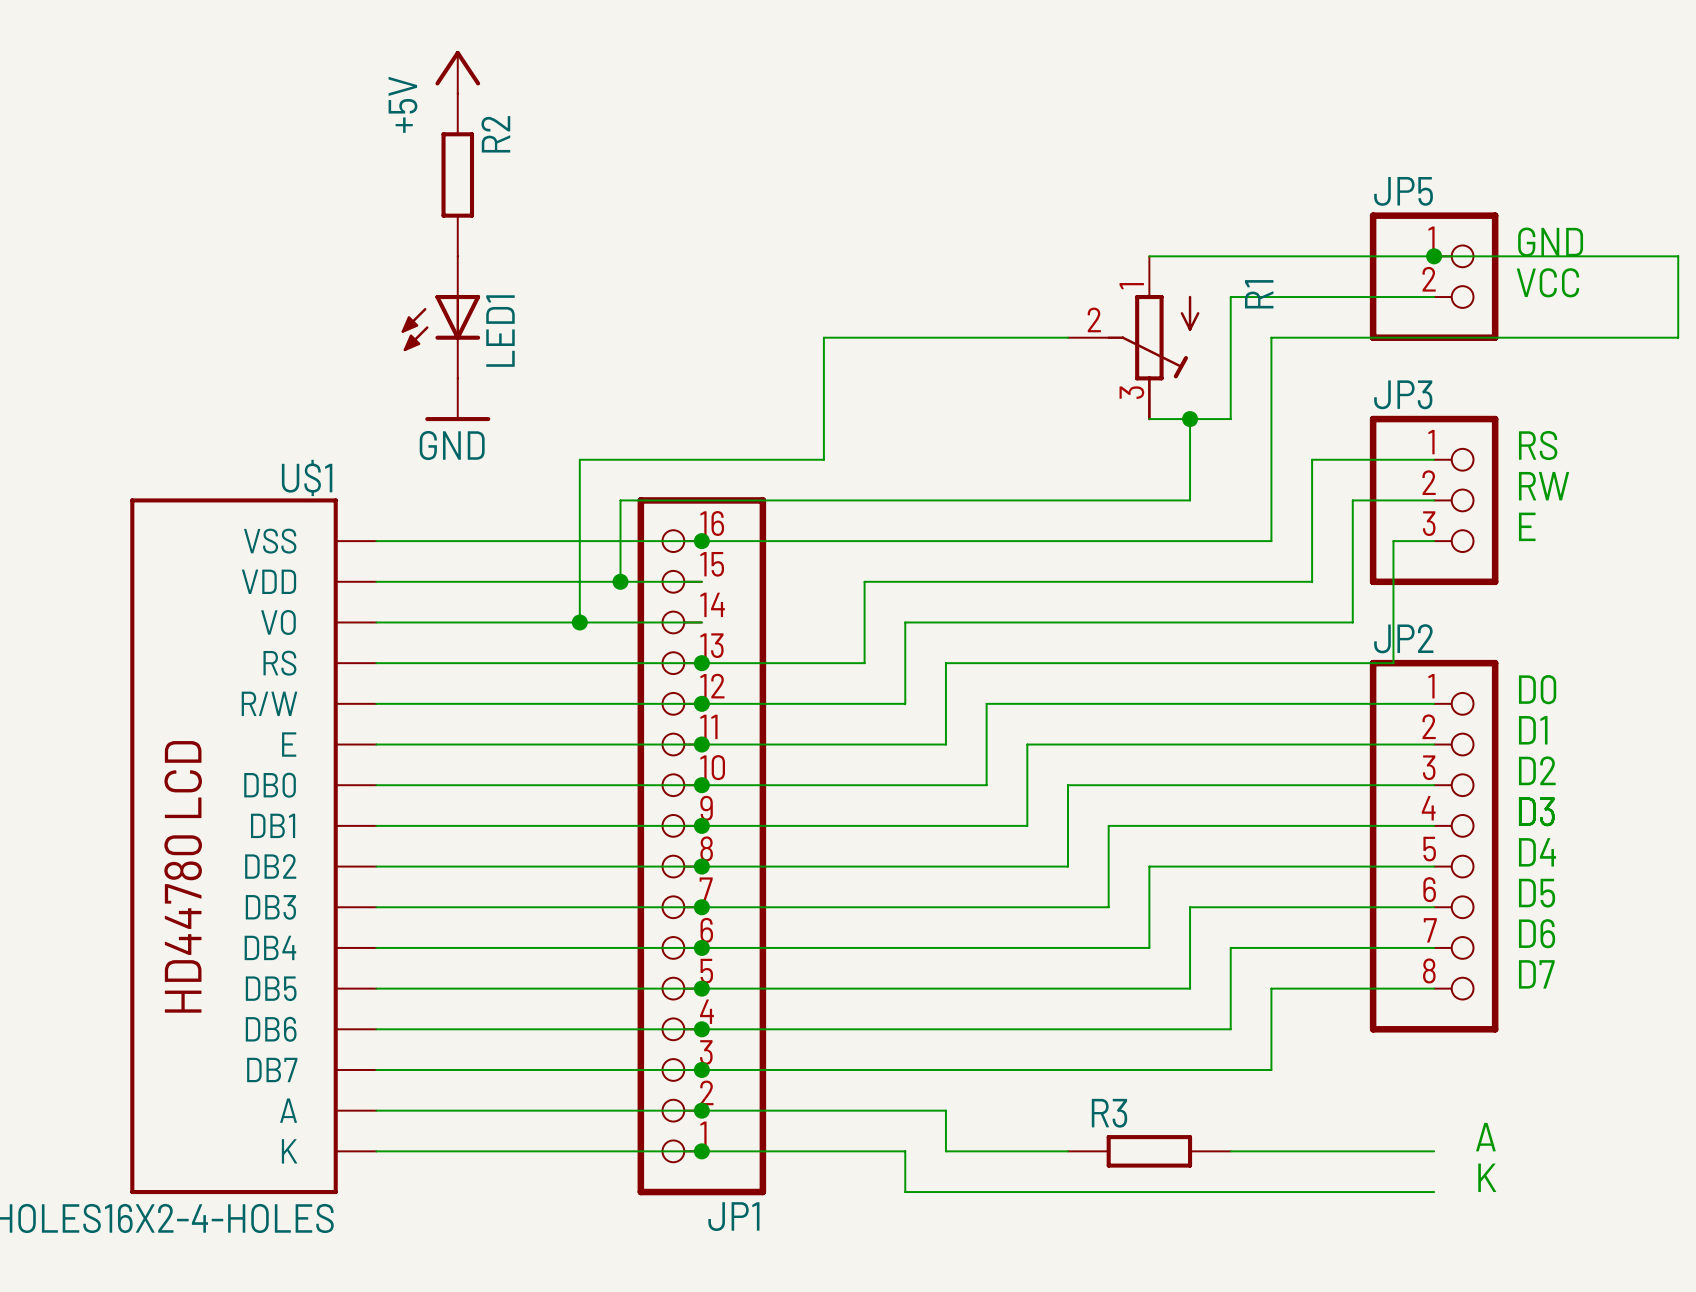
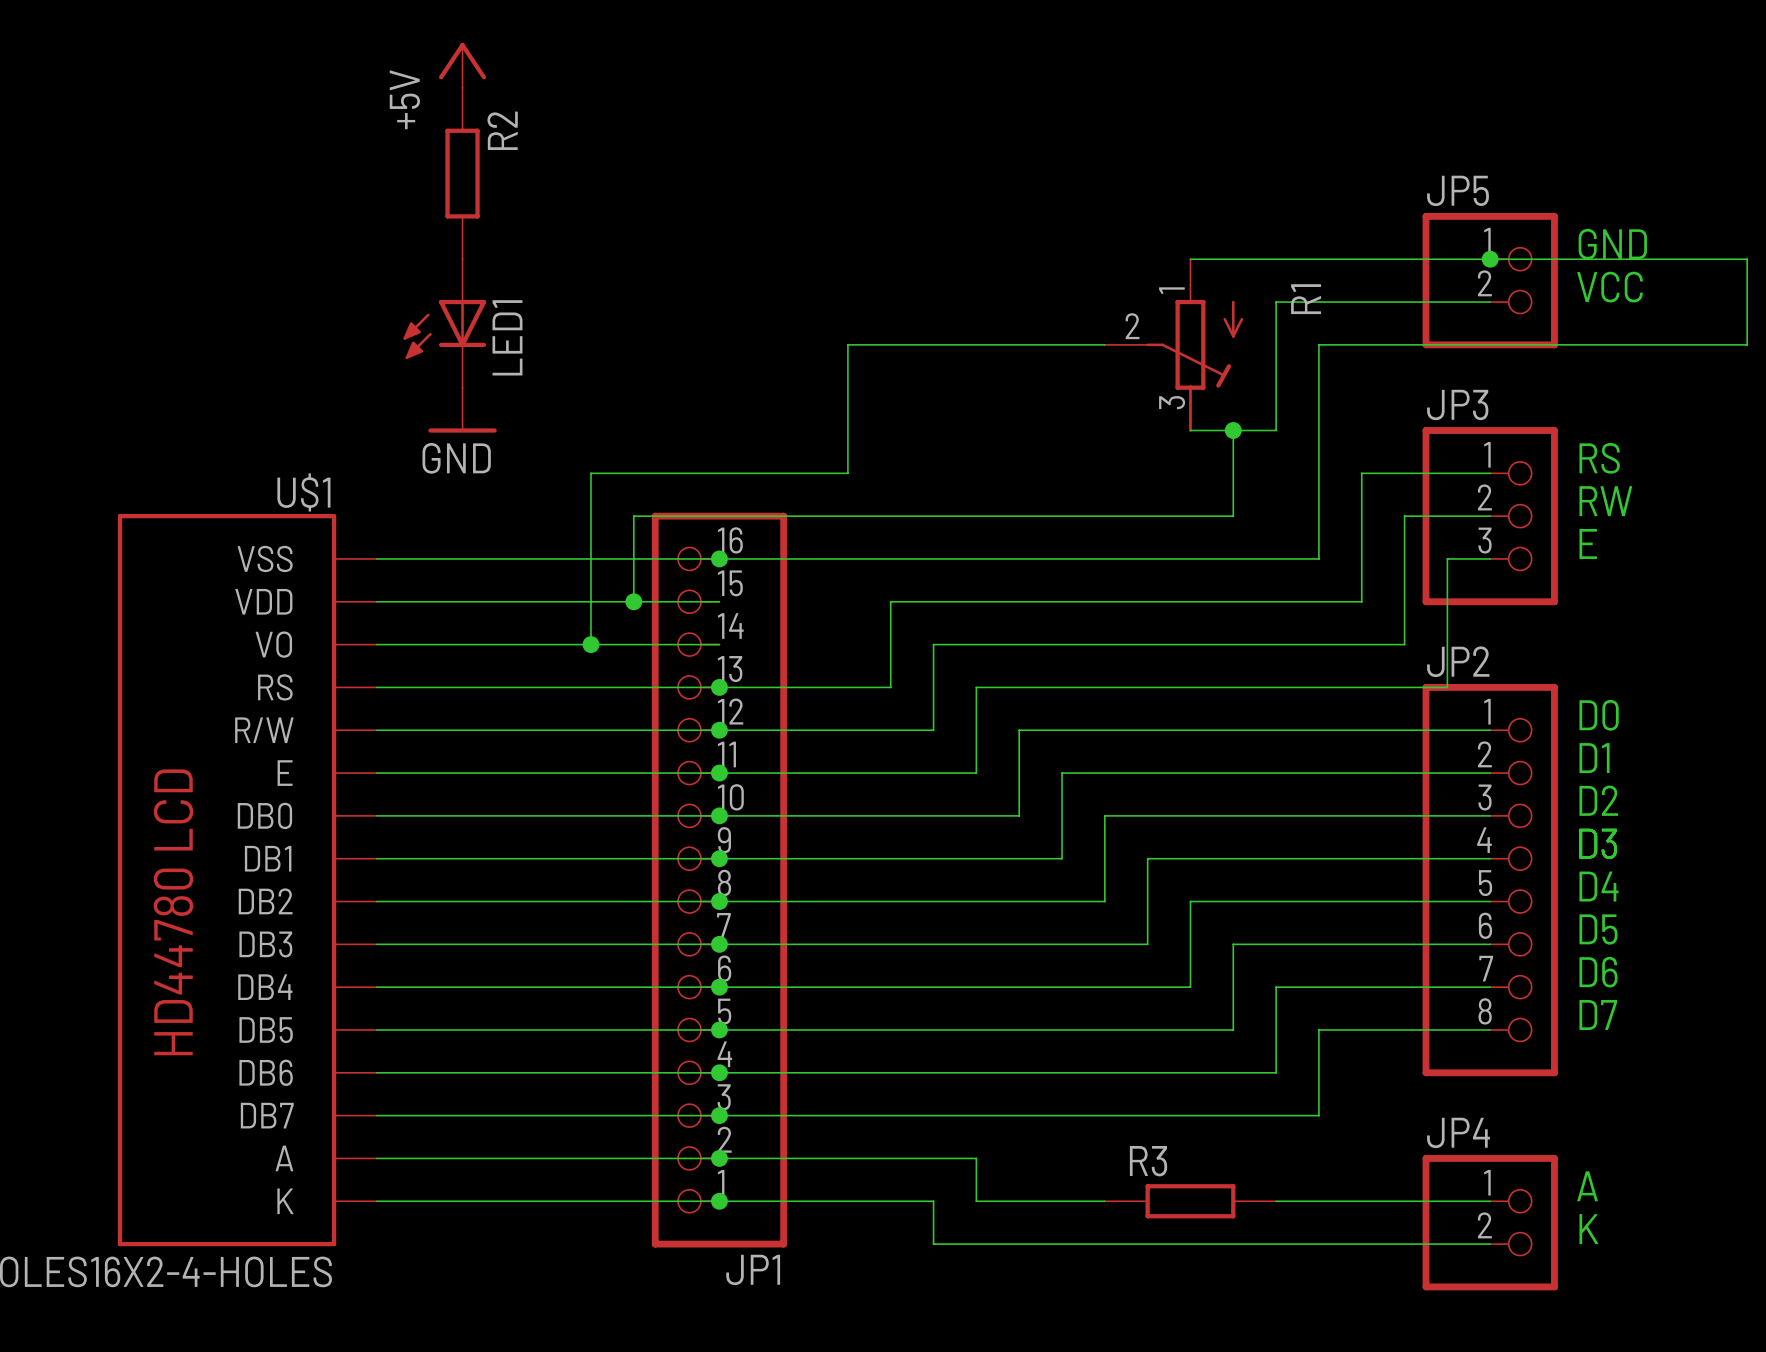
text position: A (1485, 1137) -> A (1587, 1186)
JP4: none -> (1490, 1222)
text position: K (1487, 1177) -> K (1588, 1229)

